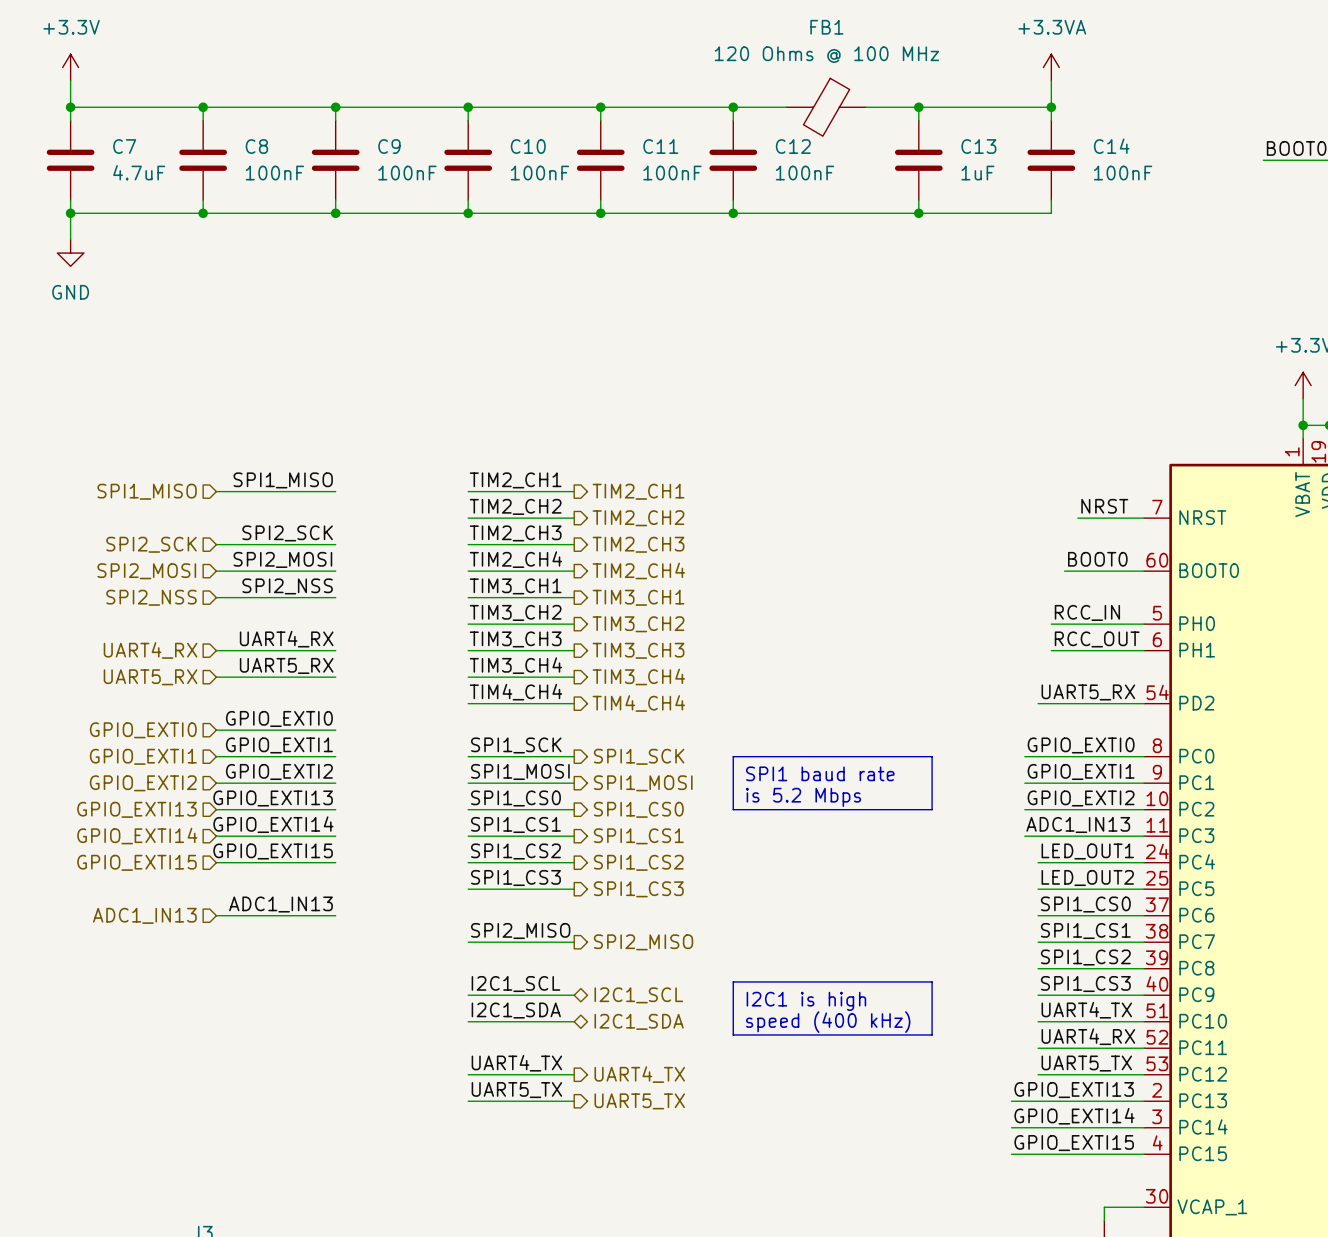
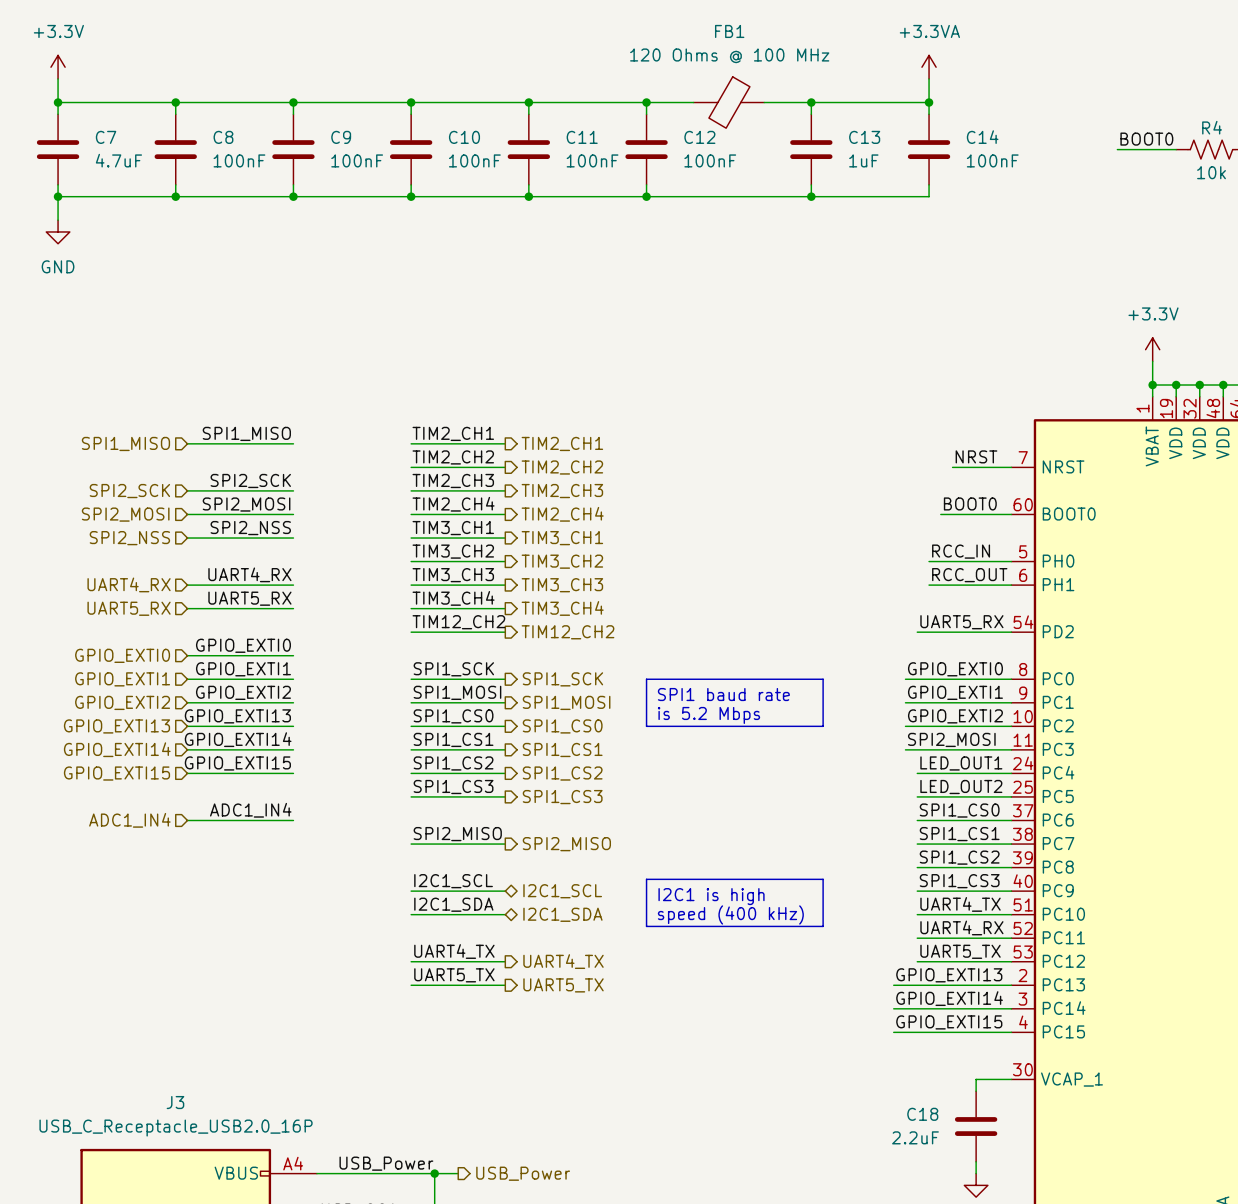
label: TIM4_CH4 (515, 692) -> TIM12_CH2 (458, 622)
hierarchical label: TIM4_CH4 (638, 703) -> TIM12_CH2 (567, 632)
label: ADC1_IN13 (1078, 824) -> SPI2_MOSI (951, 739)
label: ADC1_IN13 (280, 904) -> ADC1_IN4 (250, 810)
hierarchical label: ADC1_IN13 (144, 915) -> ADC1_IN4 (129, 820)

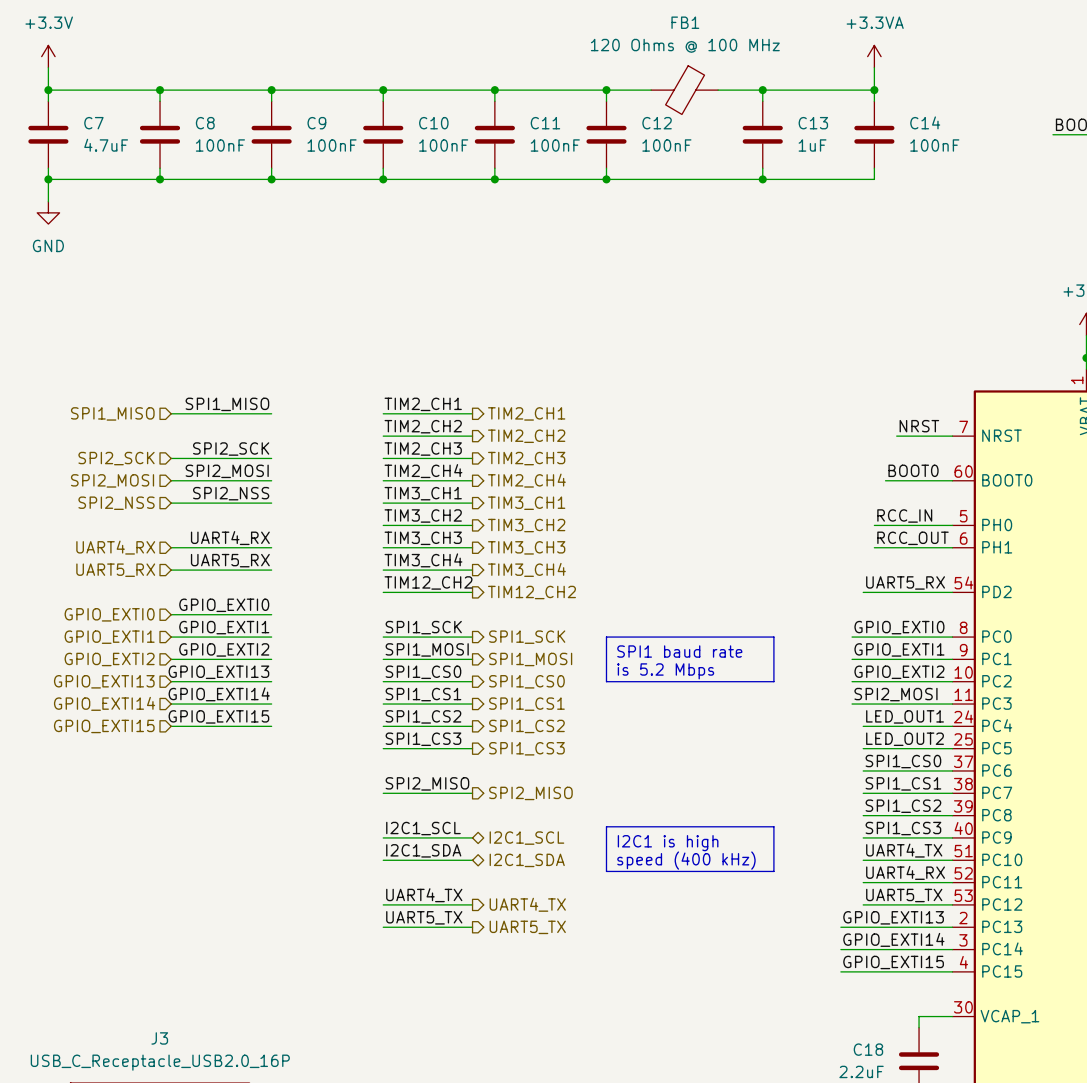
label: ADC1_IN4 (250, 810) -> none
hierarchical label: ADC1_IN4 (129, 820) -> none
wire: (187, 820) (293, 820) -> none

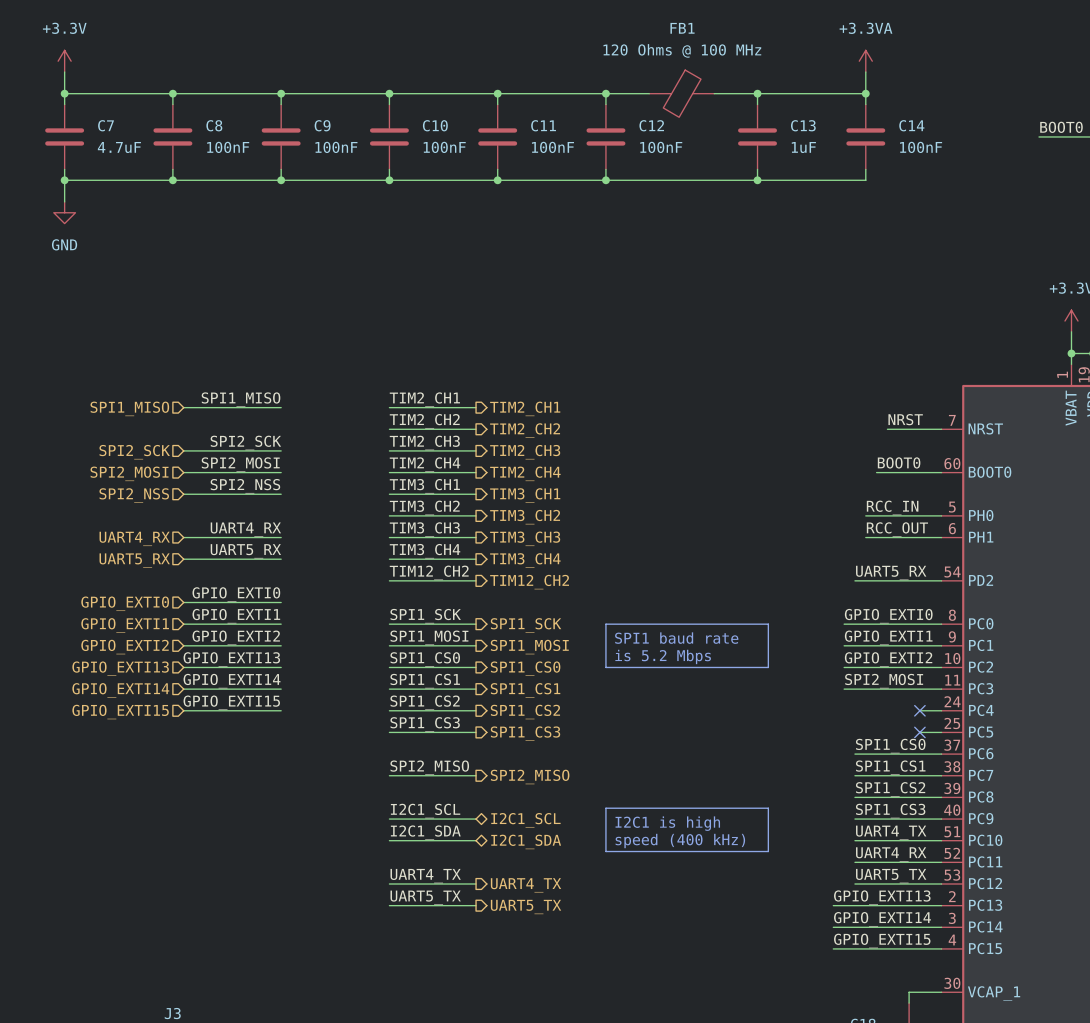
label: LED_OUT1 (905, 716) -> none
wire: (863, 726) (930, 726) -> none
no-connect mark: none -> (919, 710)
label: LED_OUT2 (905, 739) -> none
wire: (863, 748) (930, 748) -> none
no-connect mark: none -> (919, 732)

